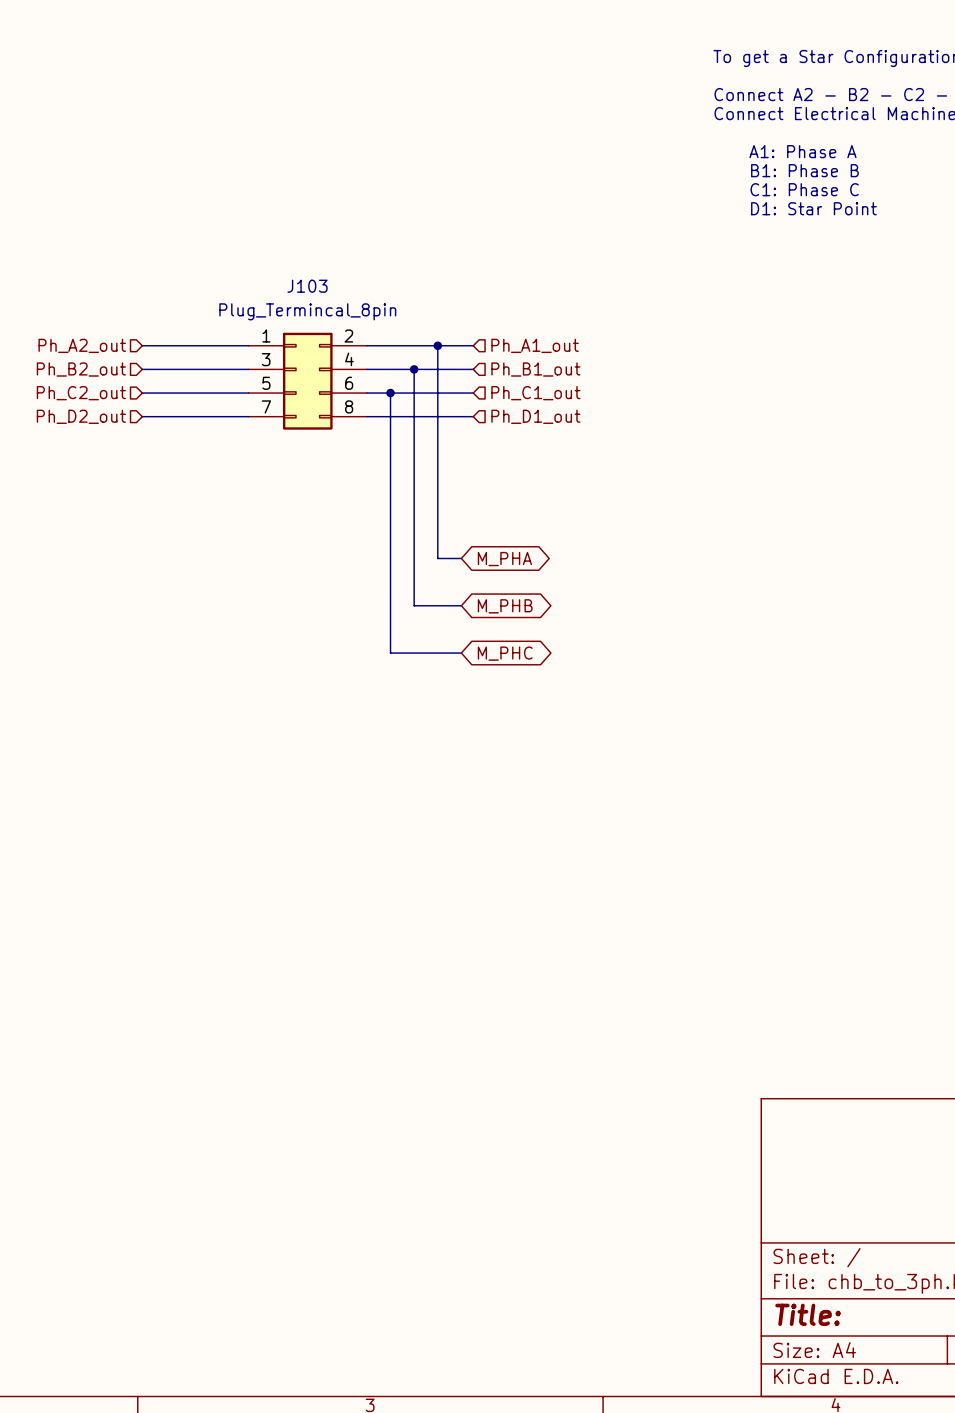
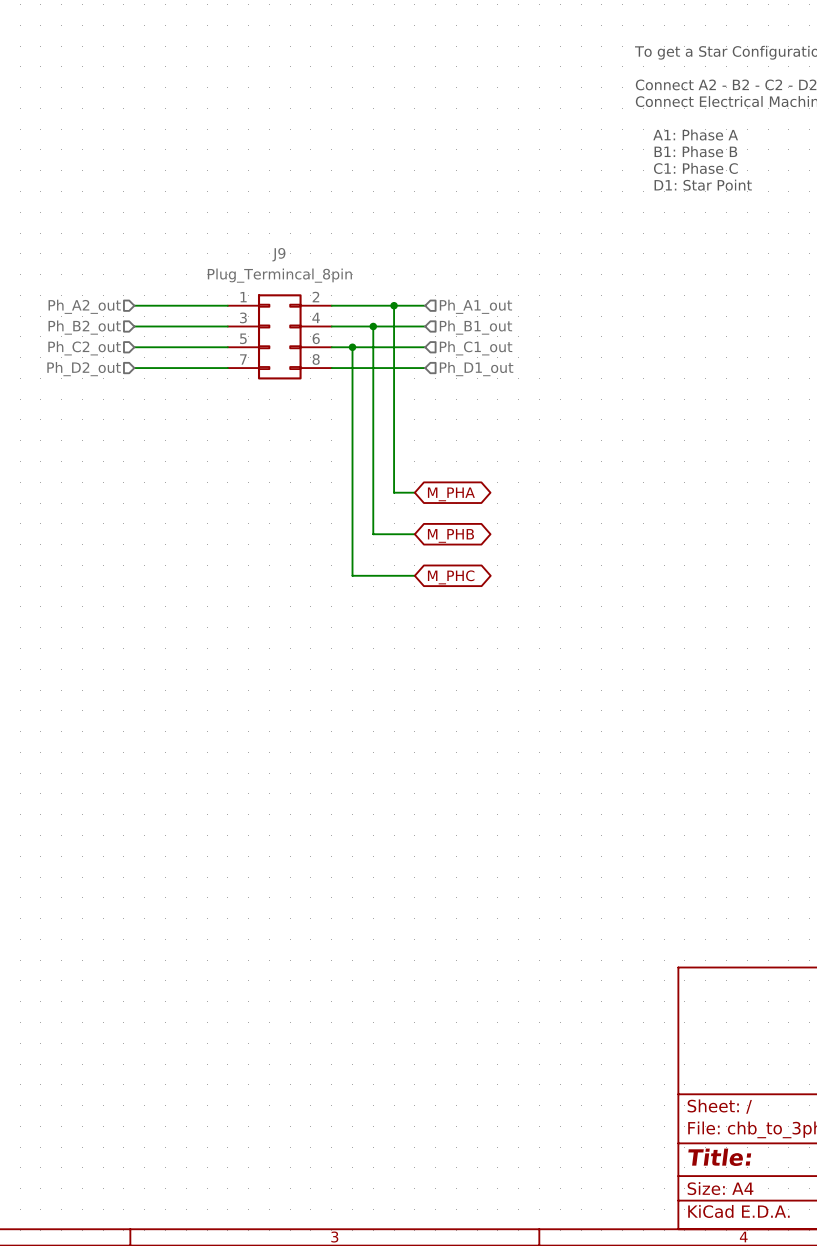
J103 name: J103 (307, 286) -> J9 (278, 254)

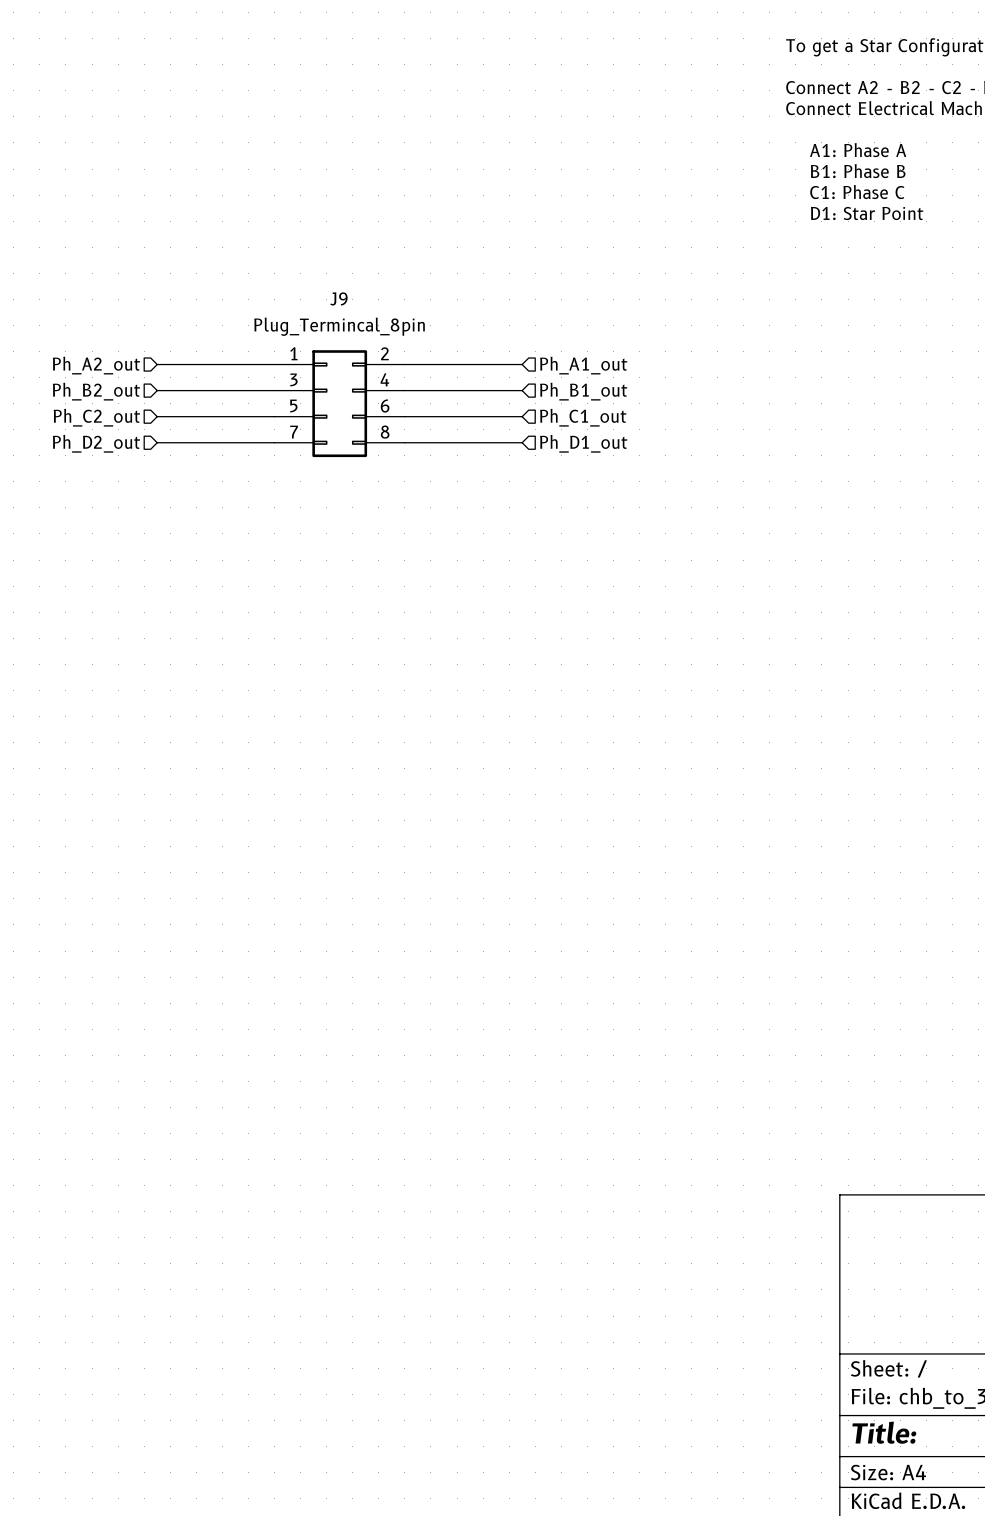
wire: (394, 305) (394, 492) (414, 492) -> none
junction: (394, 305) -> none
wire: (373, 326) (373, 534) (414, 534) -> none
junction: (373, 326) -> none
wire: (352, 347) (352, 575) (414, 575) -> none
junction: (352, 347) -> none
global label: M_PHA (451, 494) -> none
global label: M_PHB (450, 535) -> none
global label: M_PHC (451, 577) -> none

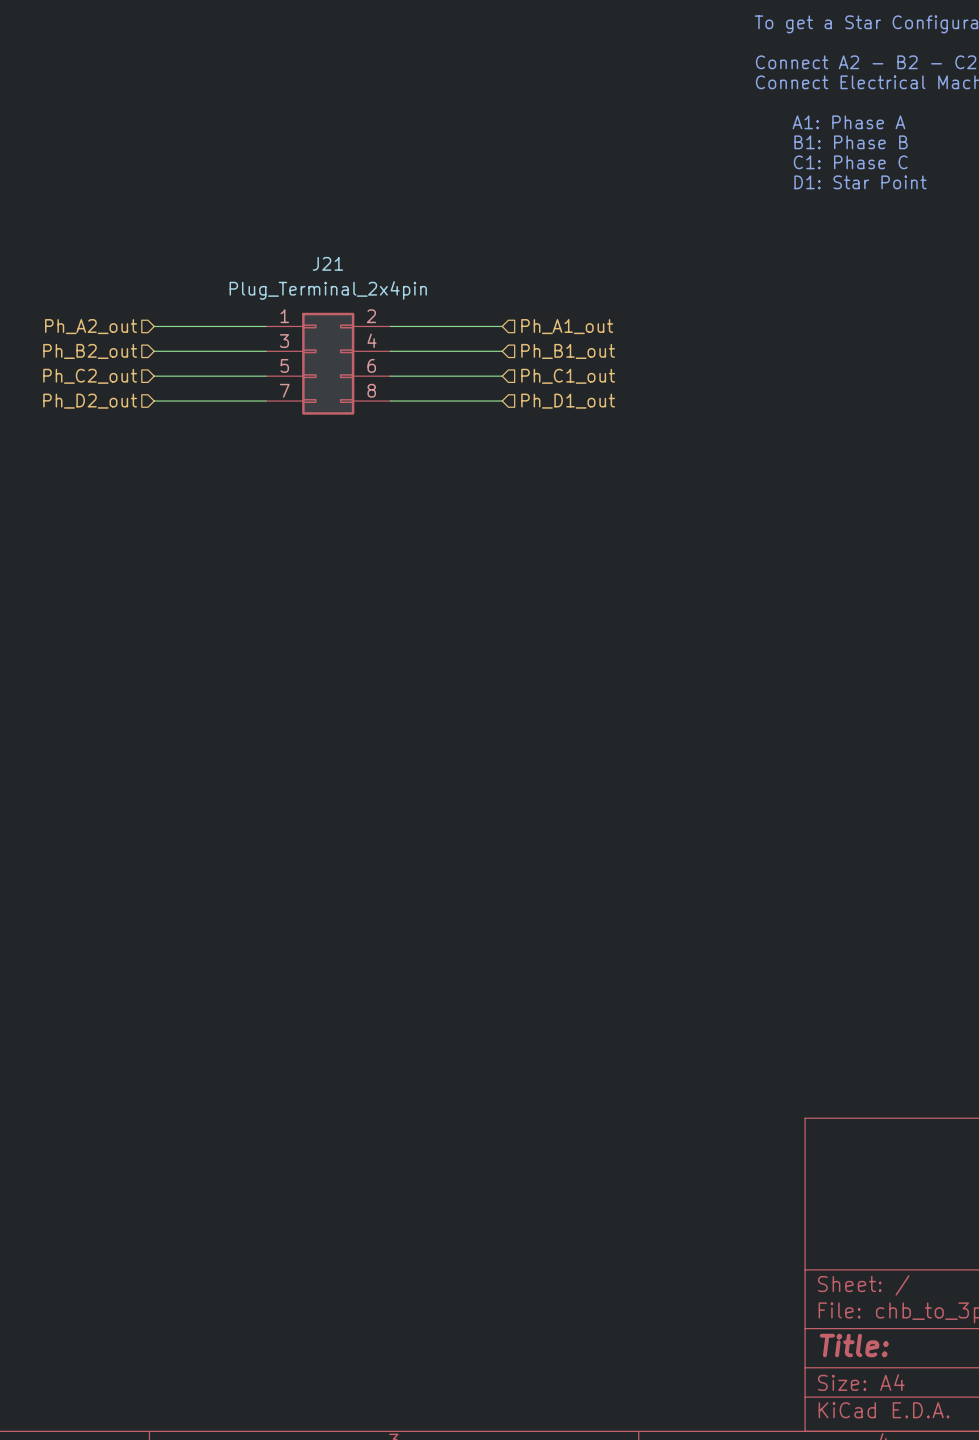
J9 name: J9 (338, 298) -> J21 (327, 263)
J9 value: Plug_Termincal_8pin (339, 326) -> Plug_Terminal_2x4pin (328, 290)

